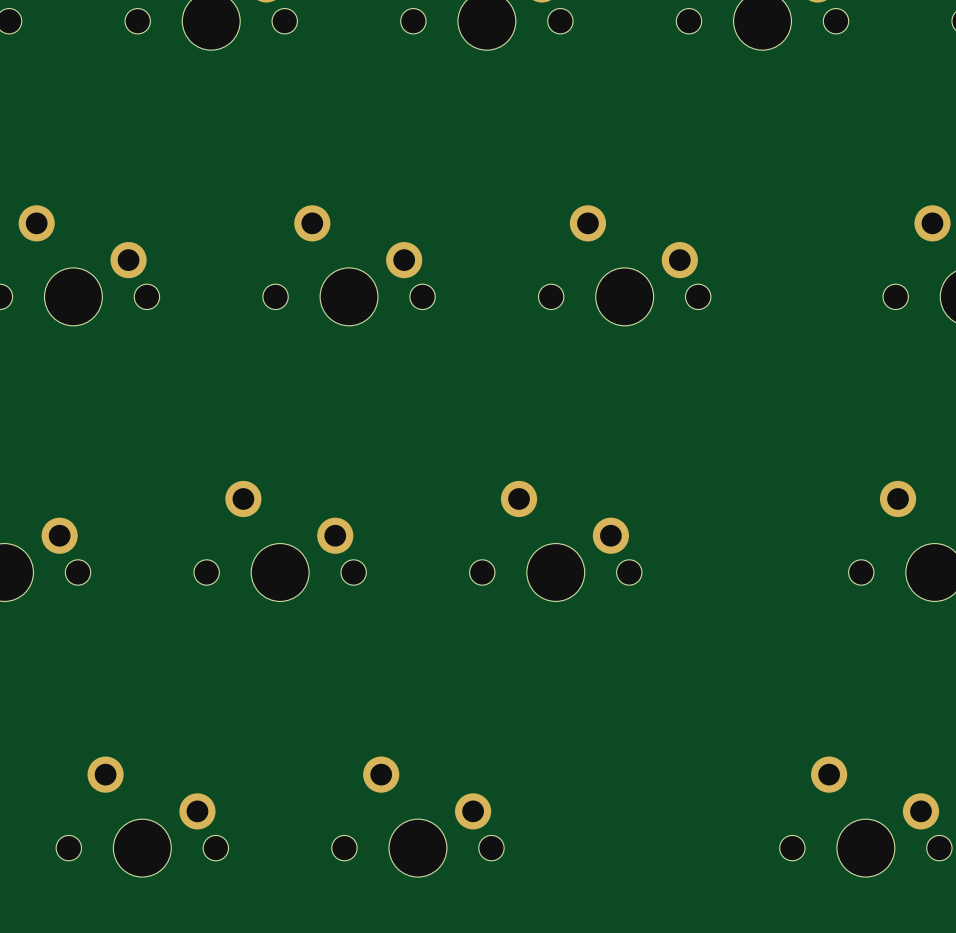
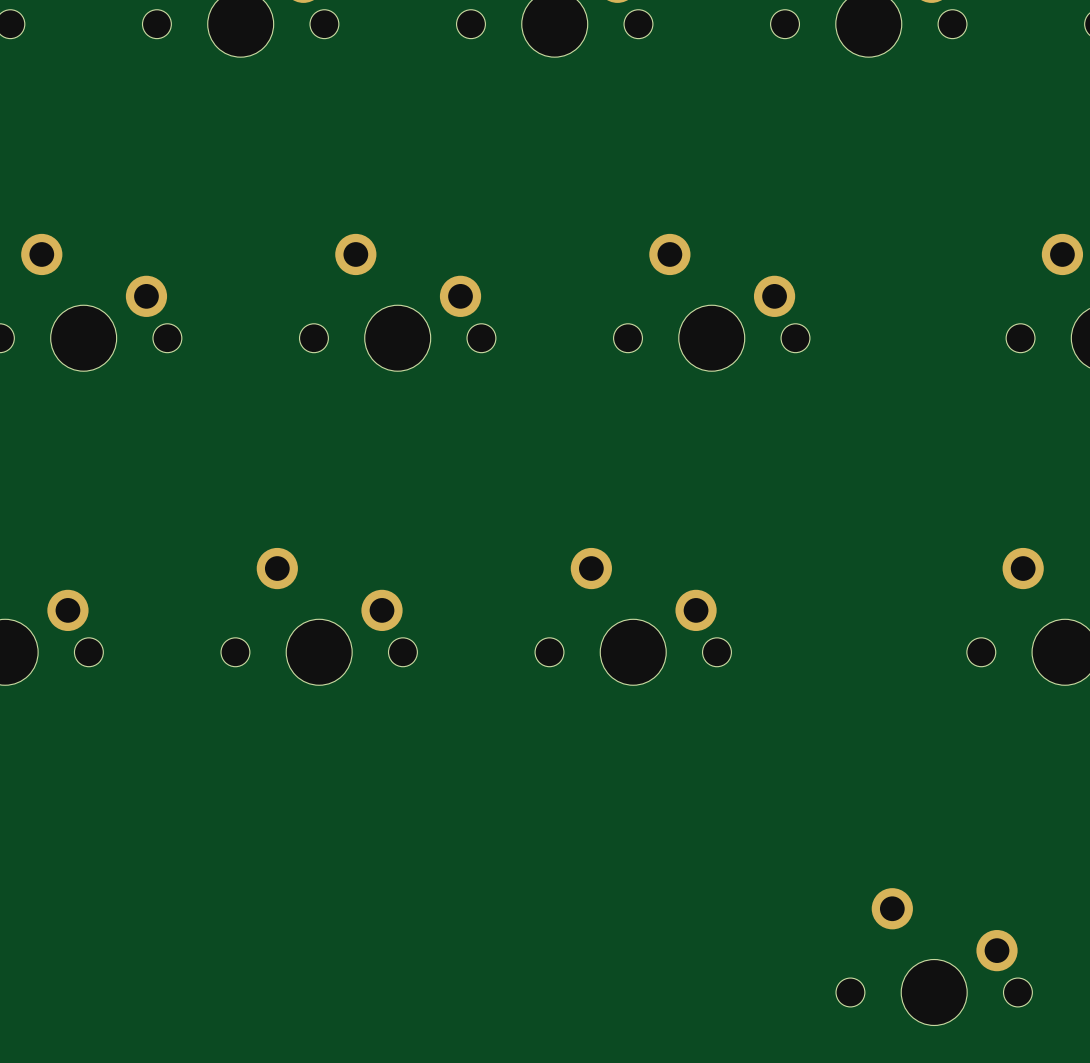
part: (142, 816) -> none
part: (417, 816) -> none
part position: (865, 816) -> (934, 956)

